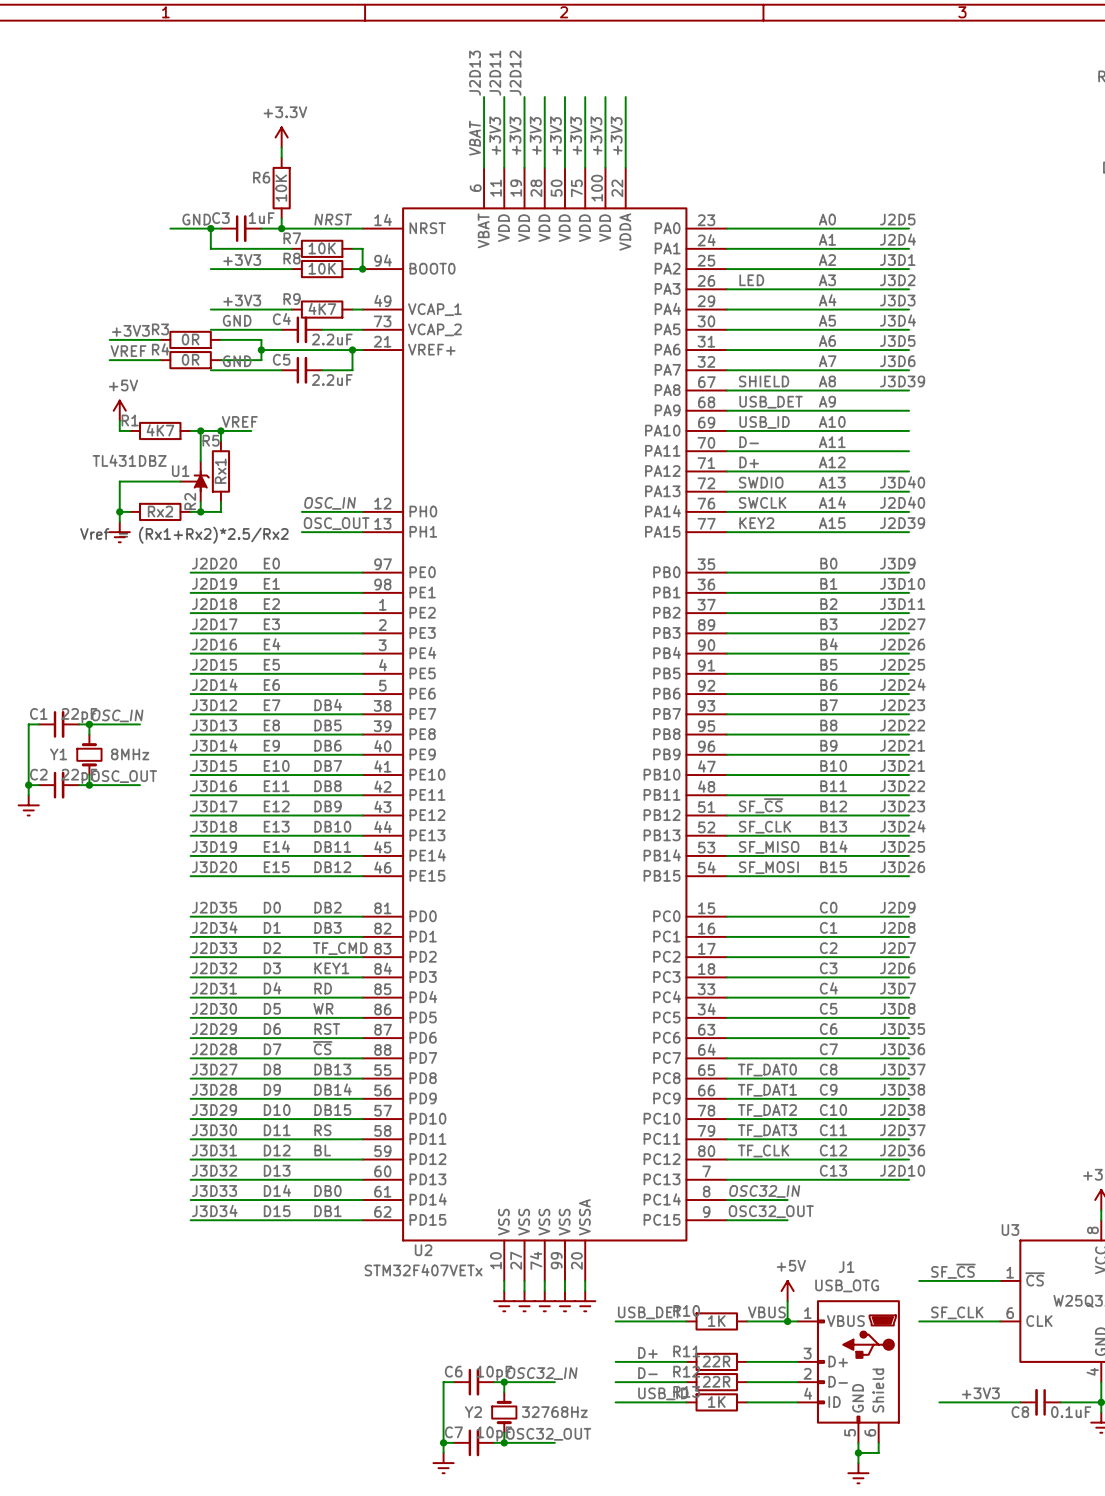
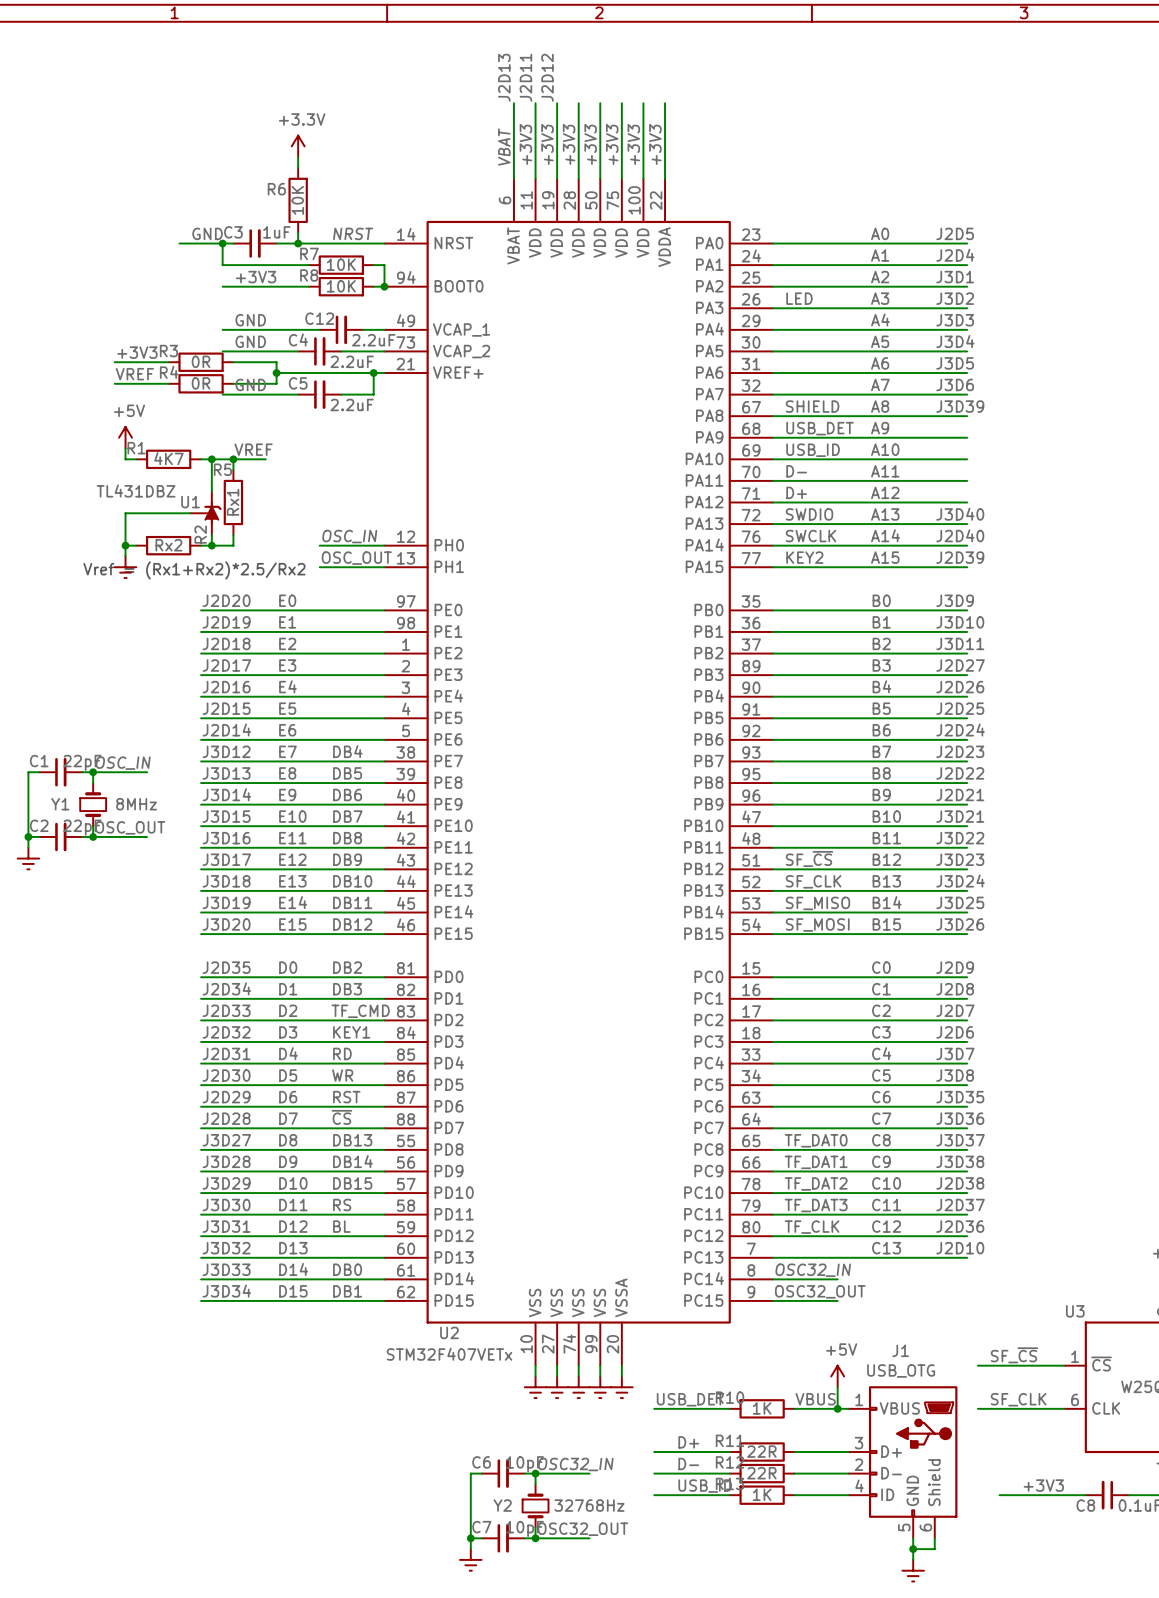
label: +3V3 (242, 300) -> GND (250, 320)
R9: 4K7 (322, 309) -> none
C12: none -> 2.2uF (341, 329)

